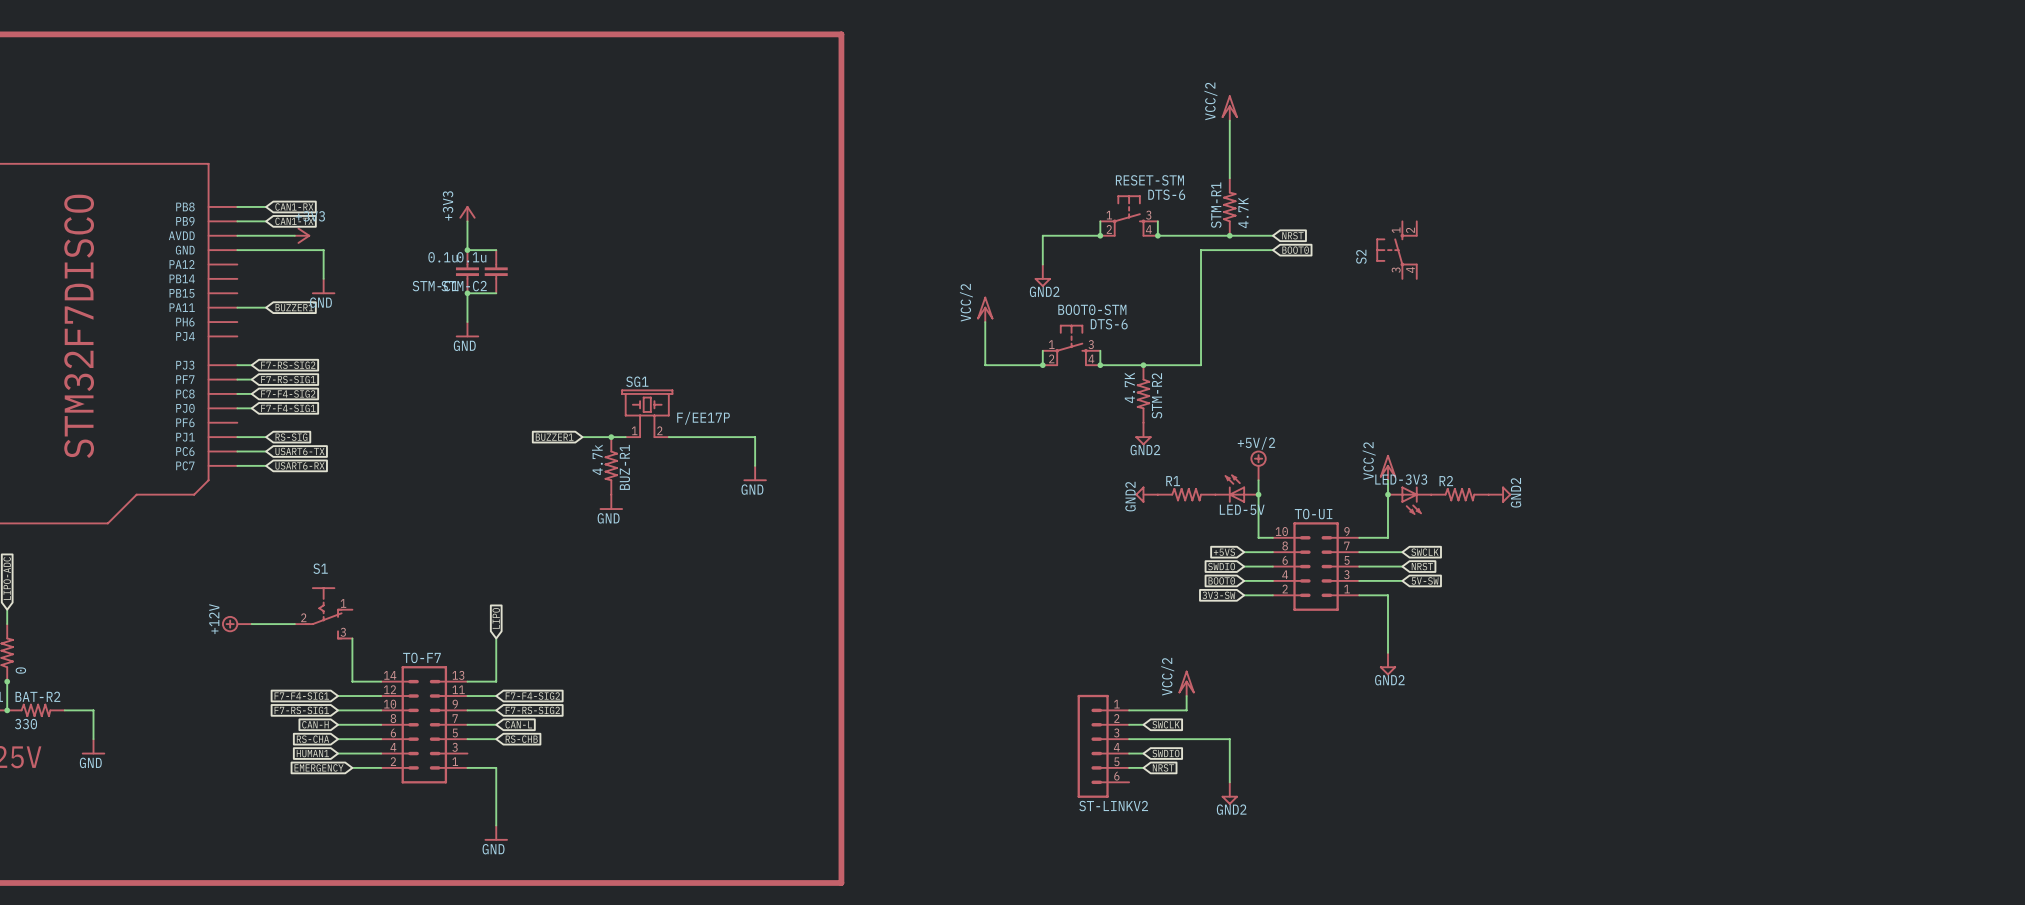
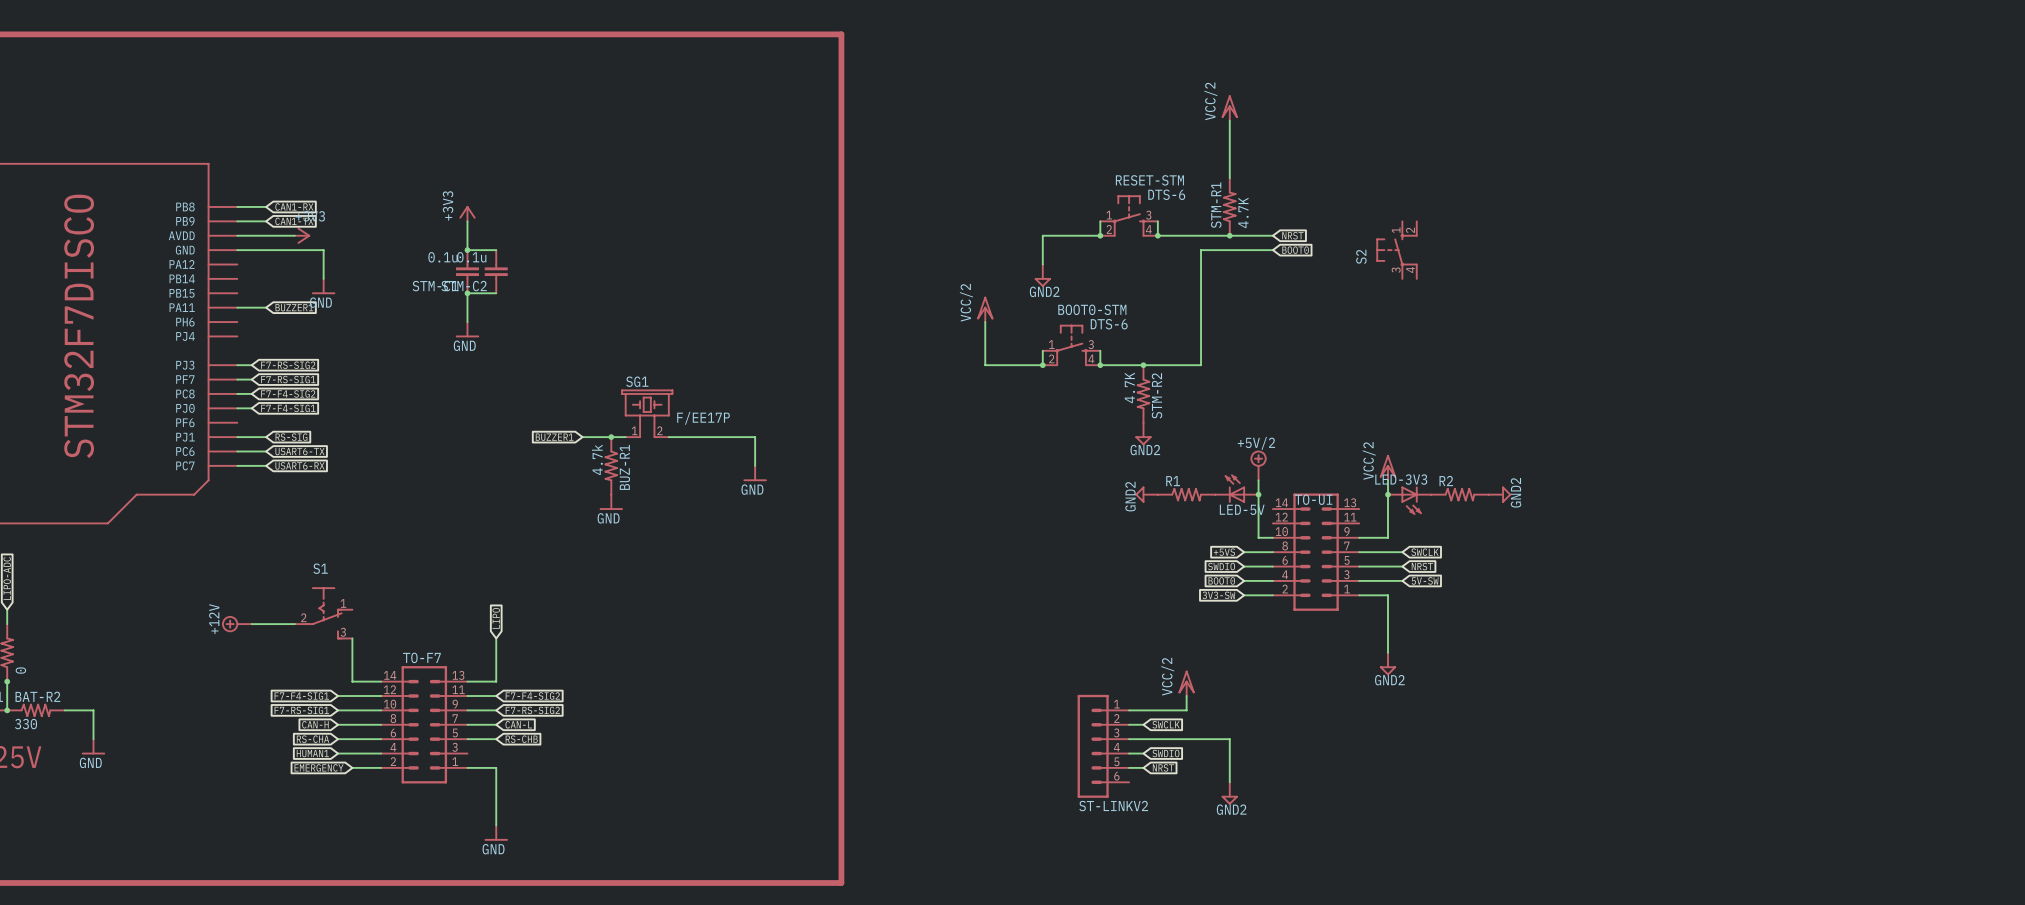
TO-UI: none -> (1316, 552)
TO-UI: (1316, 566) -> none

